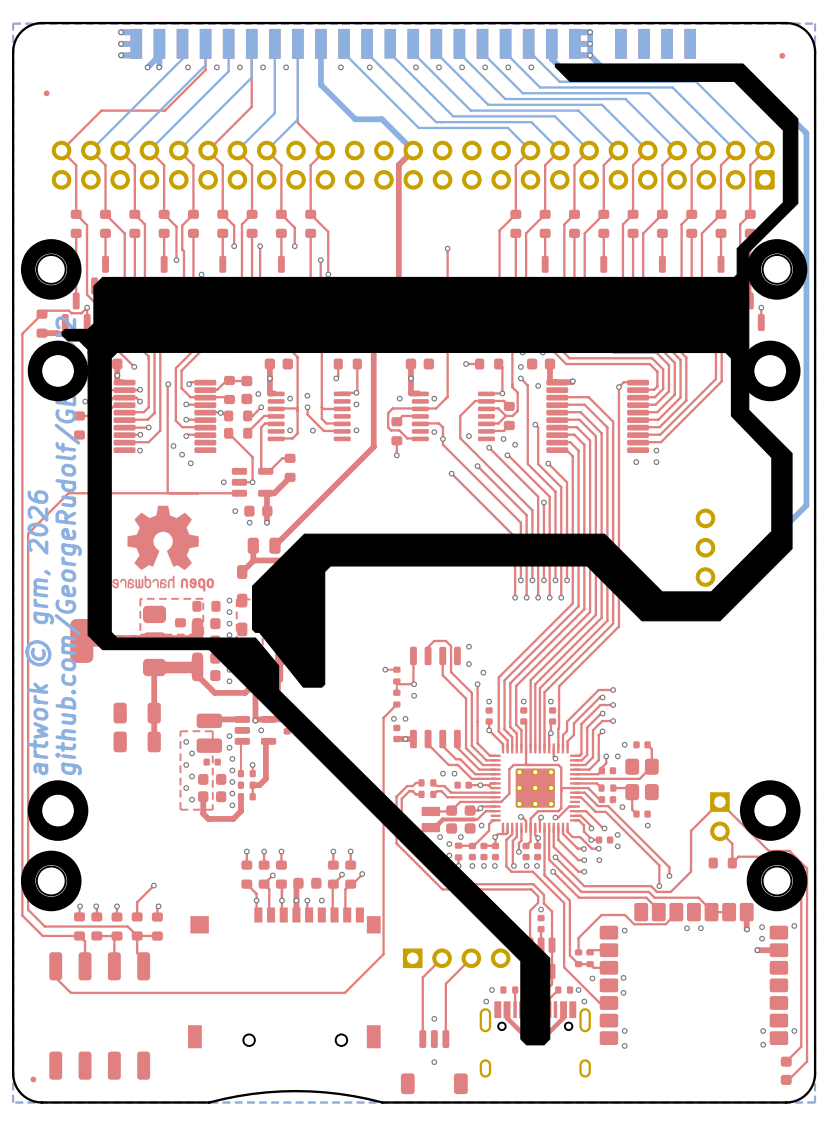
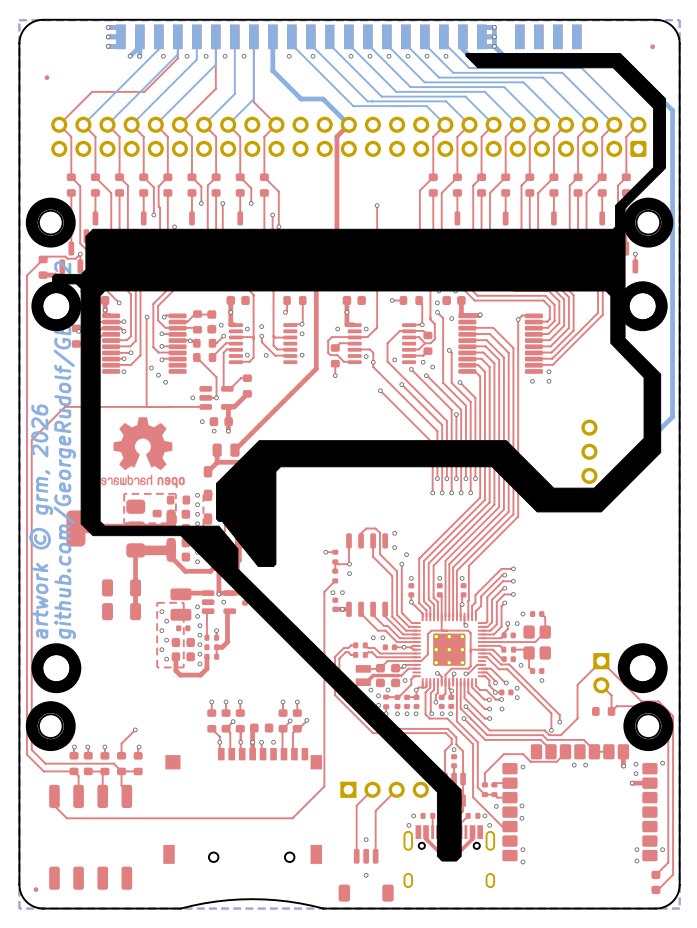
drawing shape: [61, 63, 799, 1046] -> [52, 53, 666, 862]
part: none -> (76, 336)
part: (79, 425) -> none

